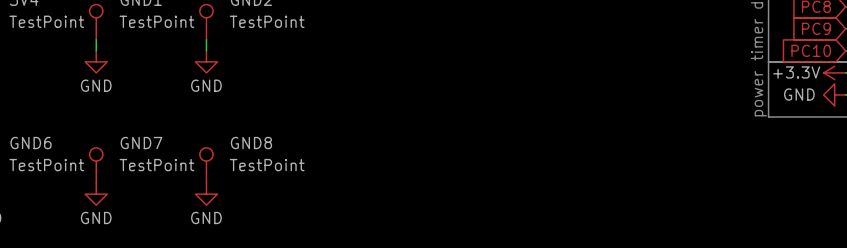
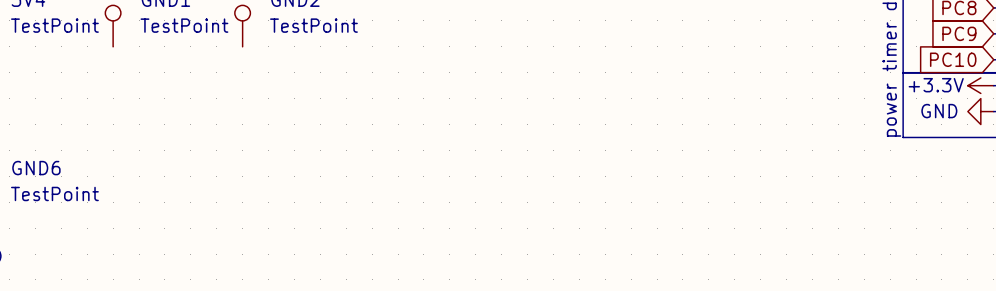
wire: (96, 39) (96, 50) -> none
wire: (206, 39) (206, 50) -> none
power symbol: GND (96, 61) -> none
power symbol: GND (206, 61) -> none
GND7: TestPoint (96, 165) -> none
GND8: TestPoint (206, 165) -> none
power symbol: GND (96, 194) -> none
power symbol: GND (206, 194) -> none

